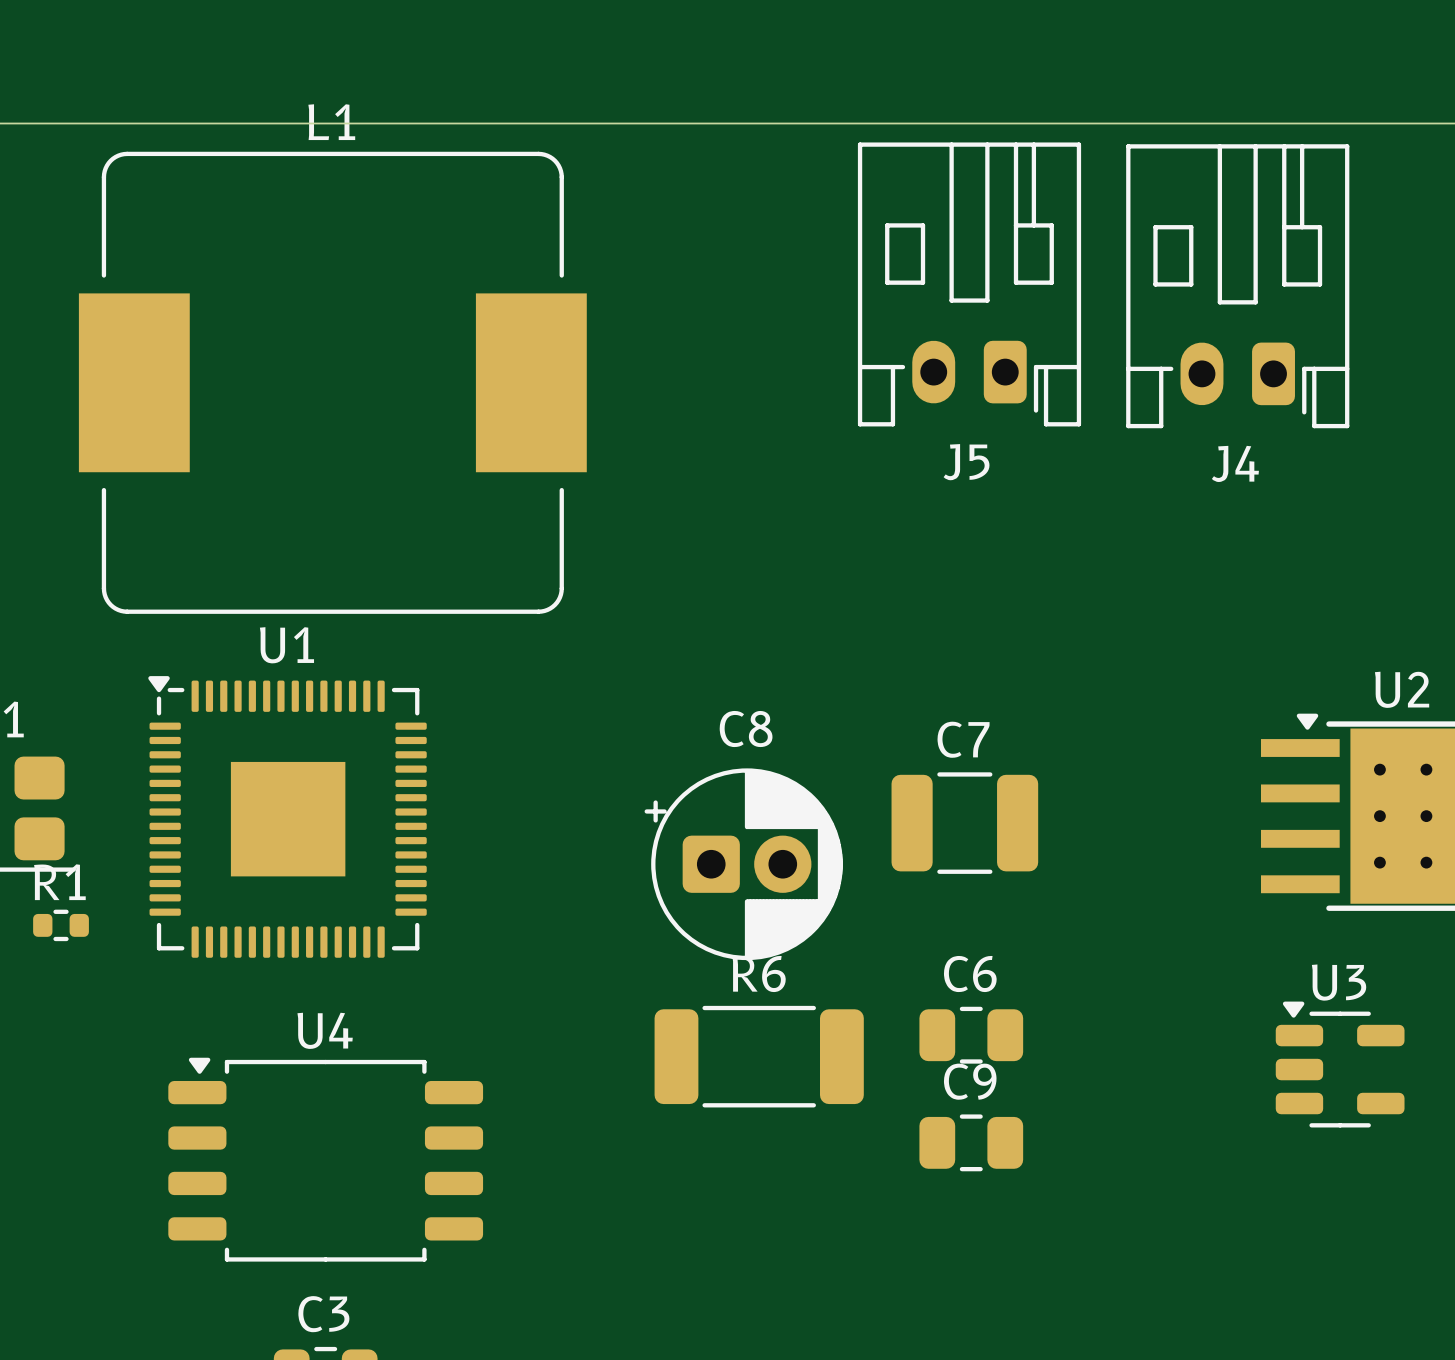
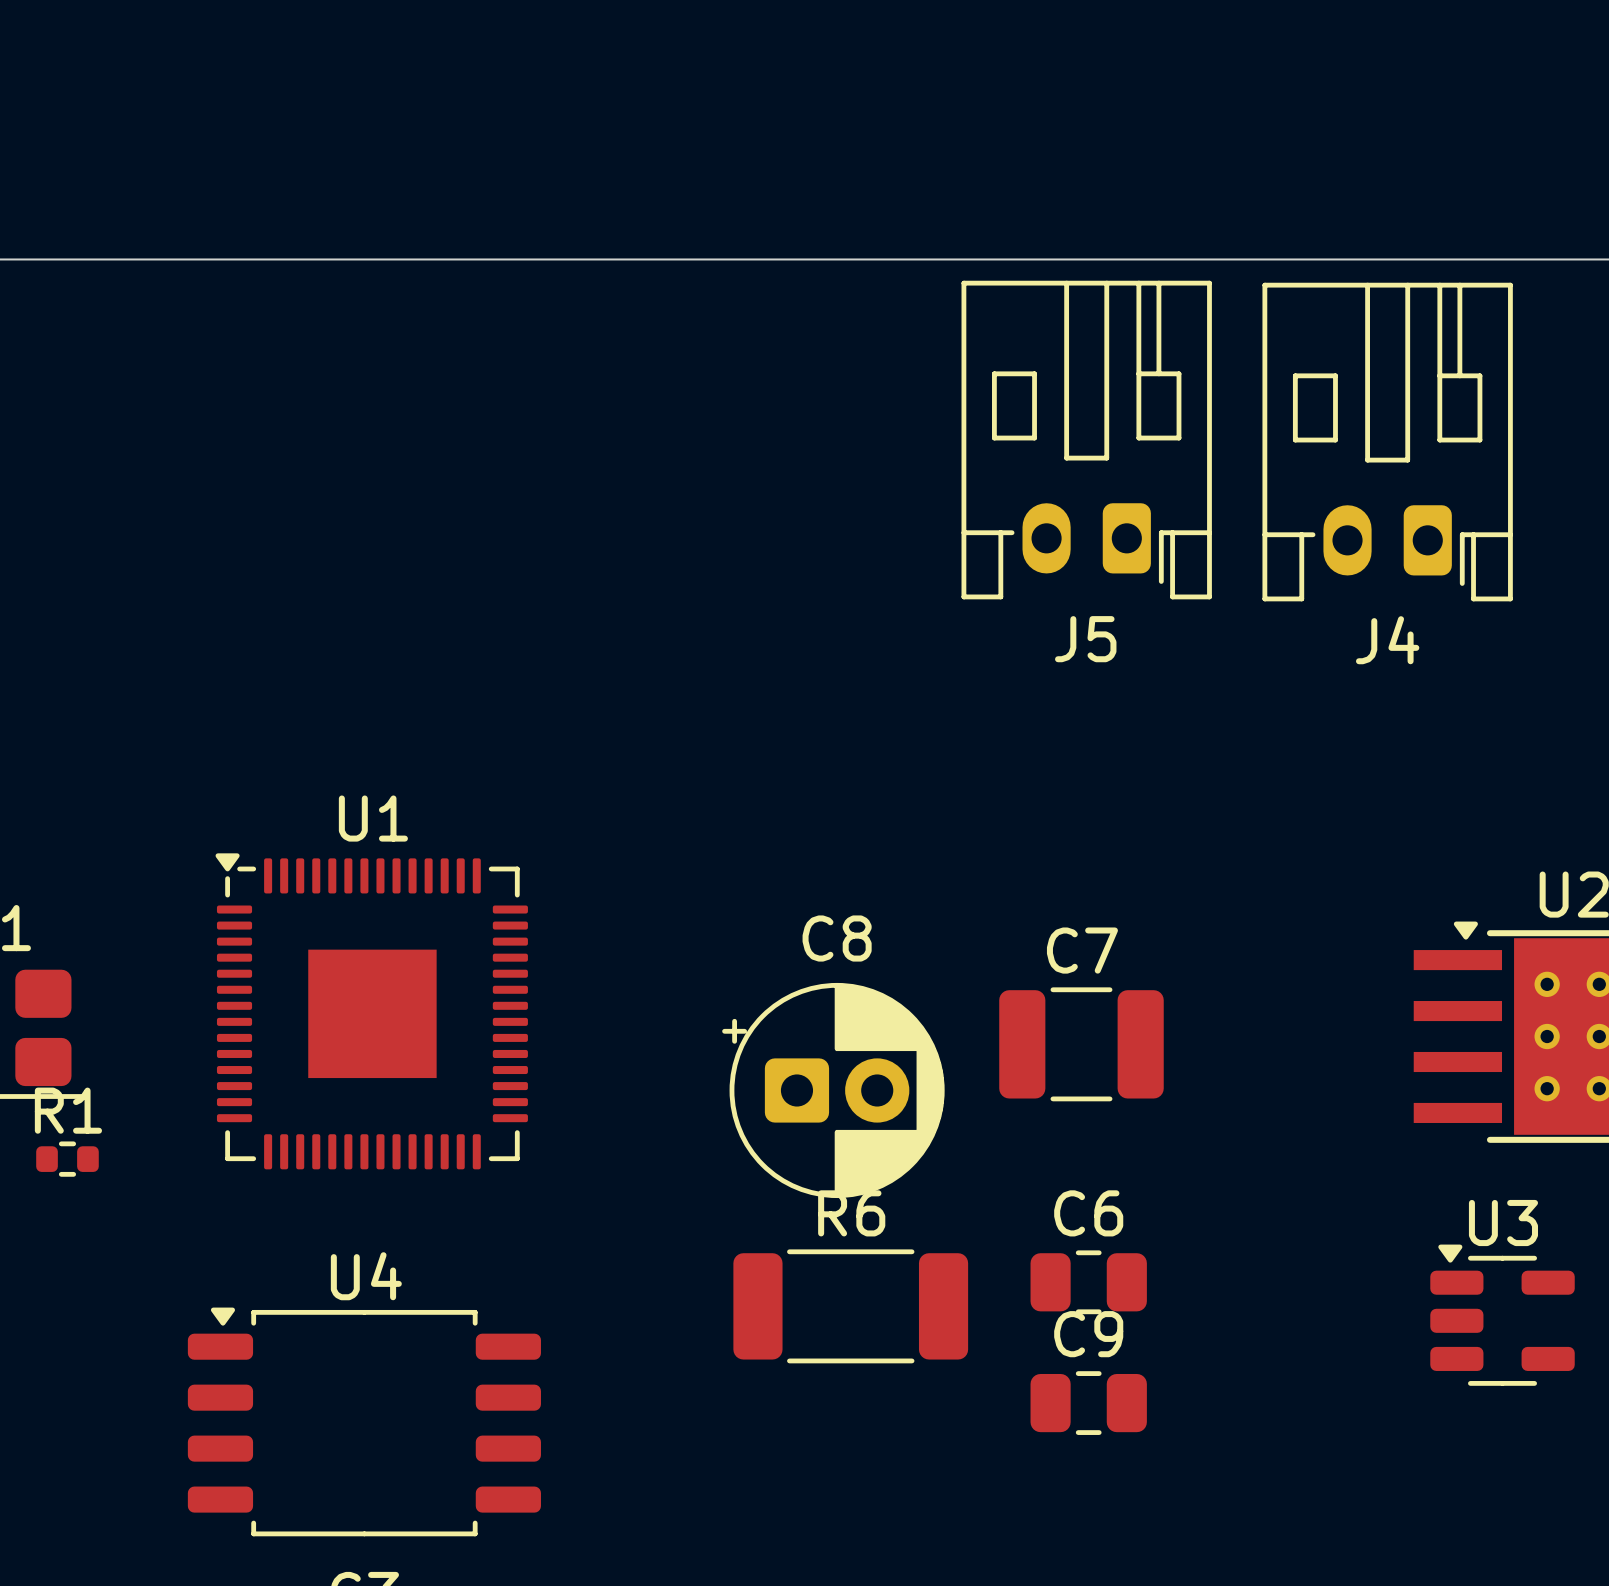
L1: (332, 382) -> none
U1 position: (287, 816) -> (371, 1011)

